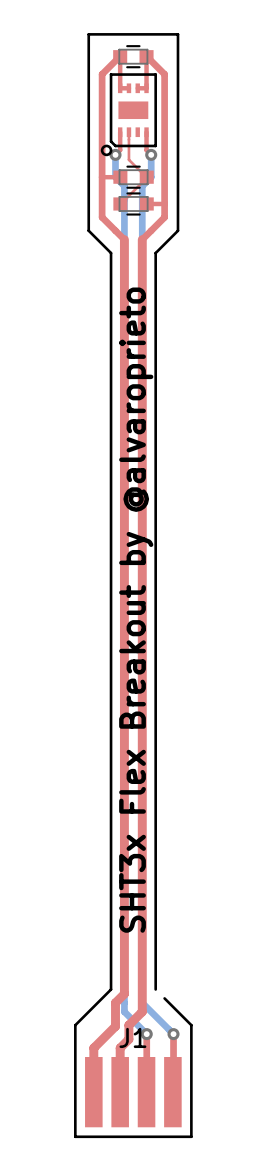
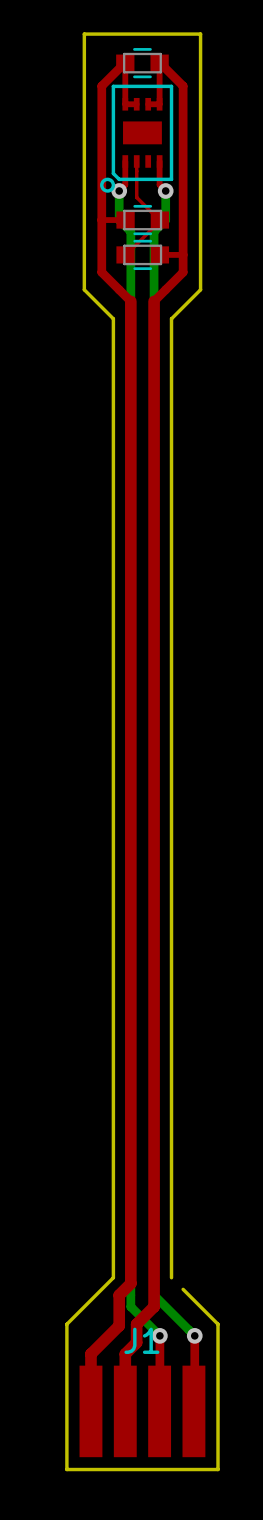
text: SHT3x Flex Breakout by @alvaroprieto (136, 610) -> none

